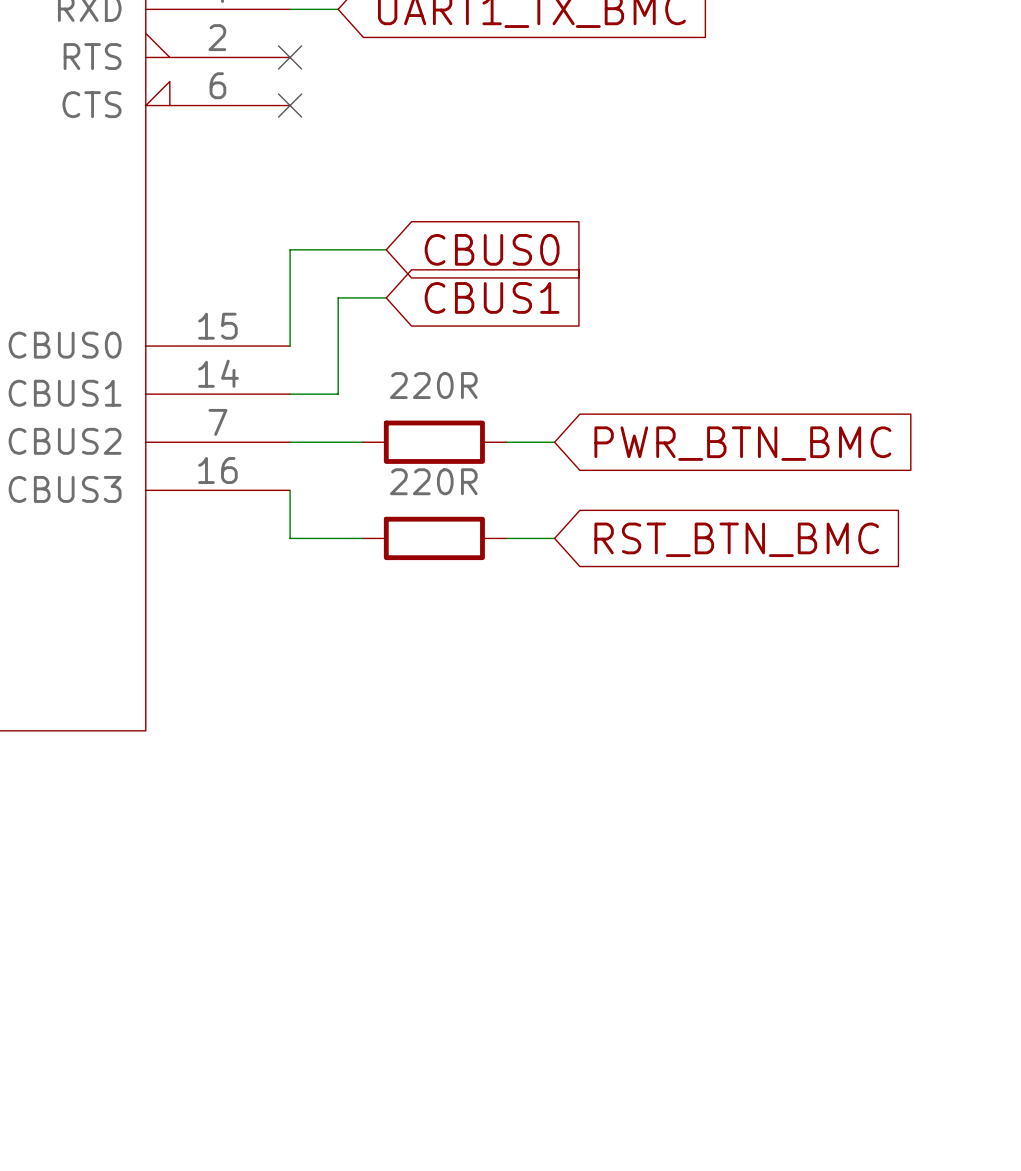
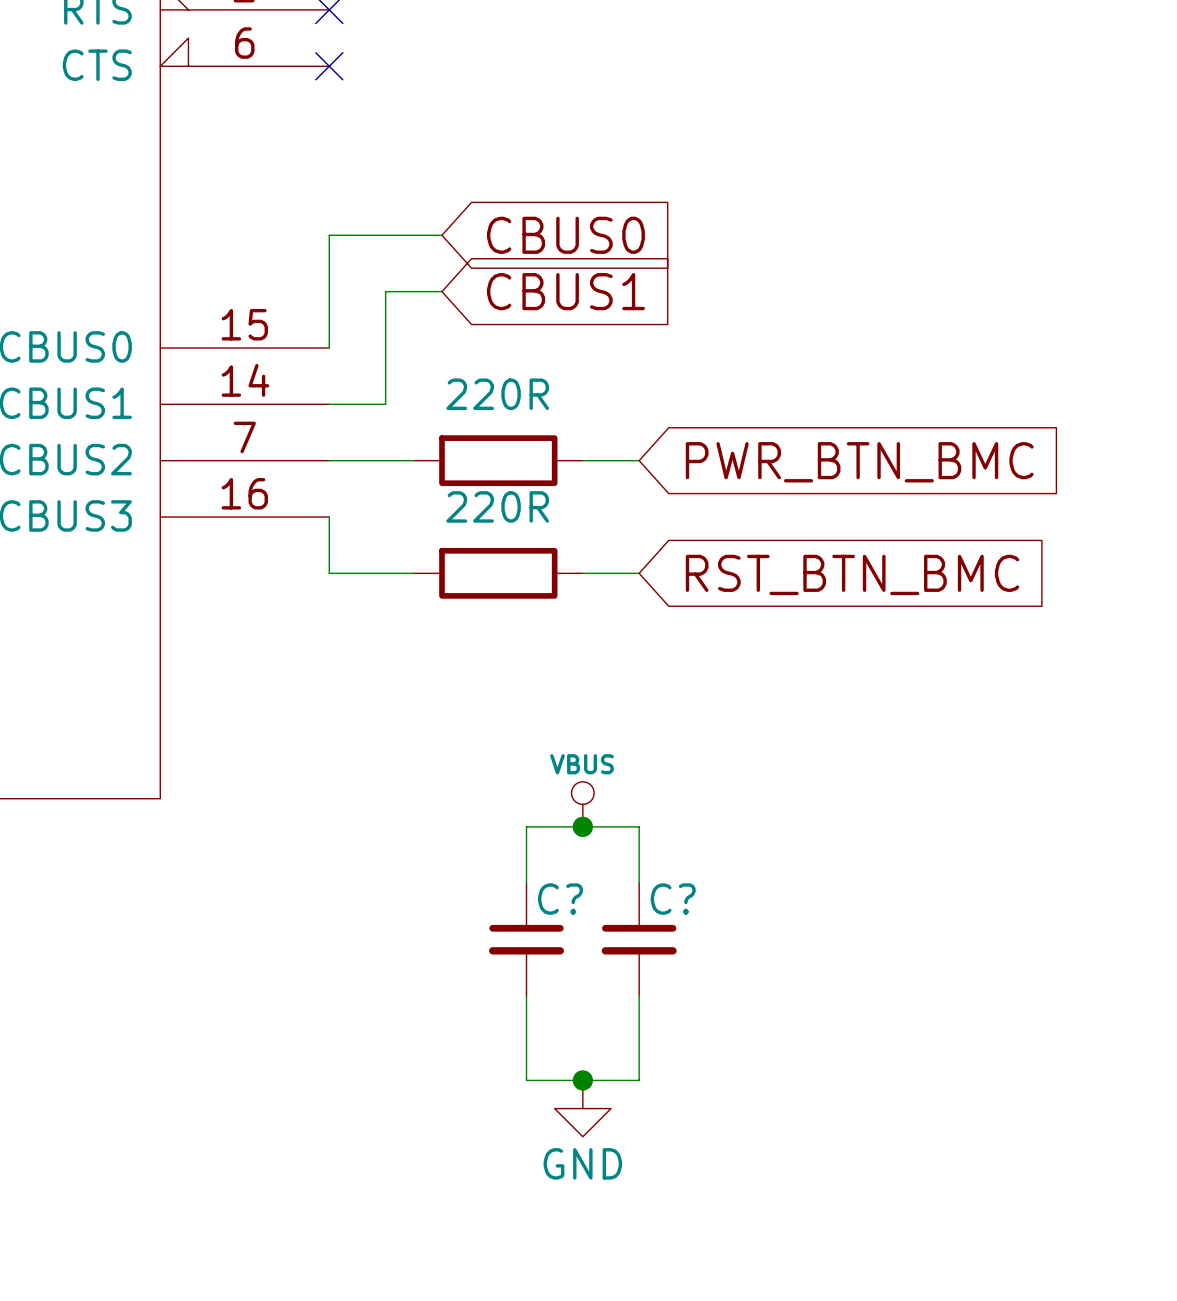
power symbol: none -> VBUS (582, 804)
junction: none -> (582, 826)
wire: none -> (526, 883) (526, 826) (639, 826) (639, 883)
C?: none -> (526, 939)
C?: none -> (639, 939)
wire: none -> (526, 995) (526, 1080) (639, 1080) (639, 995)
junction: none -> (582, 1080)
power symbol: none -> GND (582, 1108)

